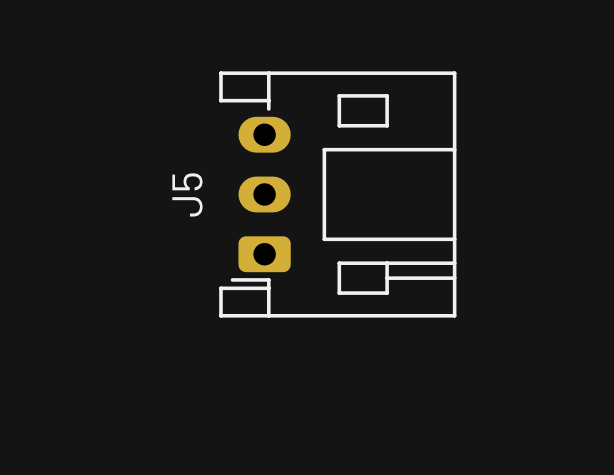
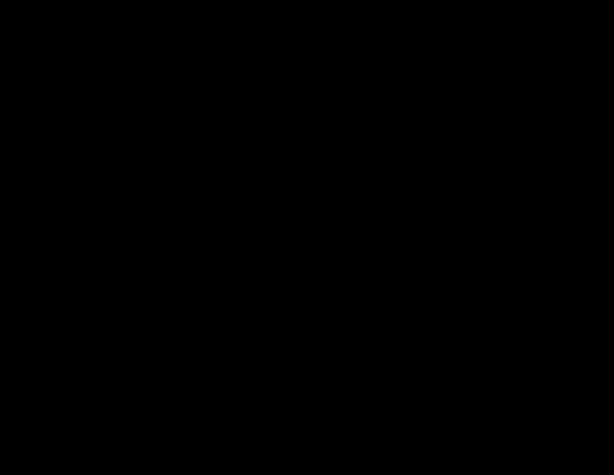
J5: (337, 194) -> none

